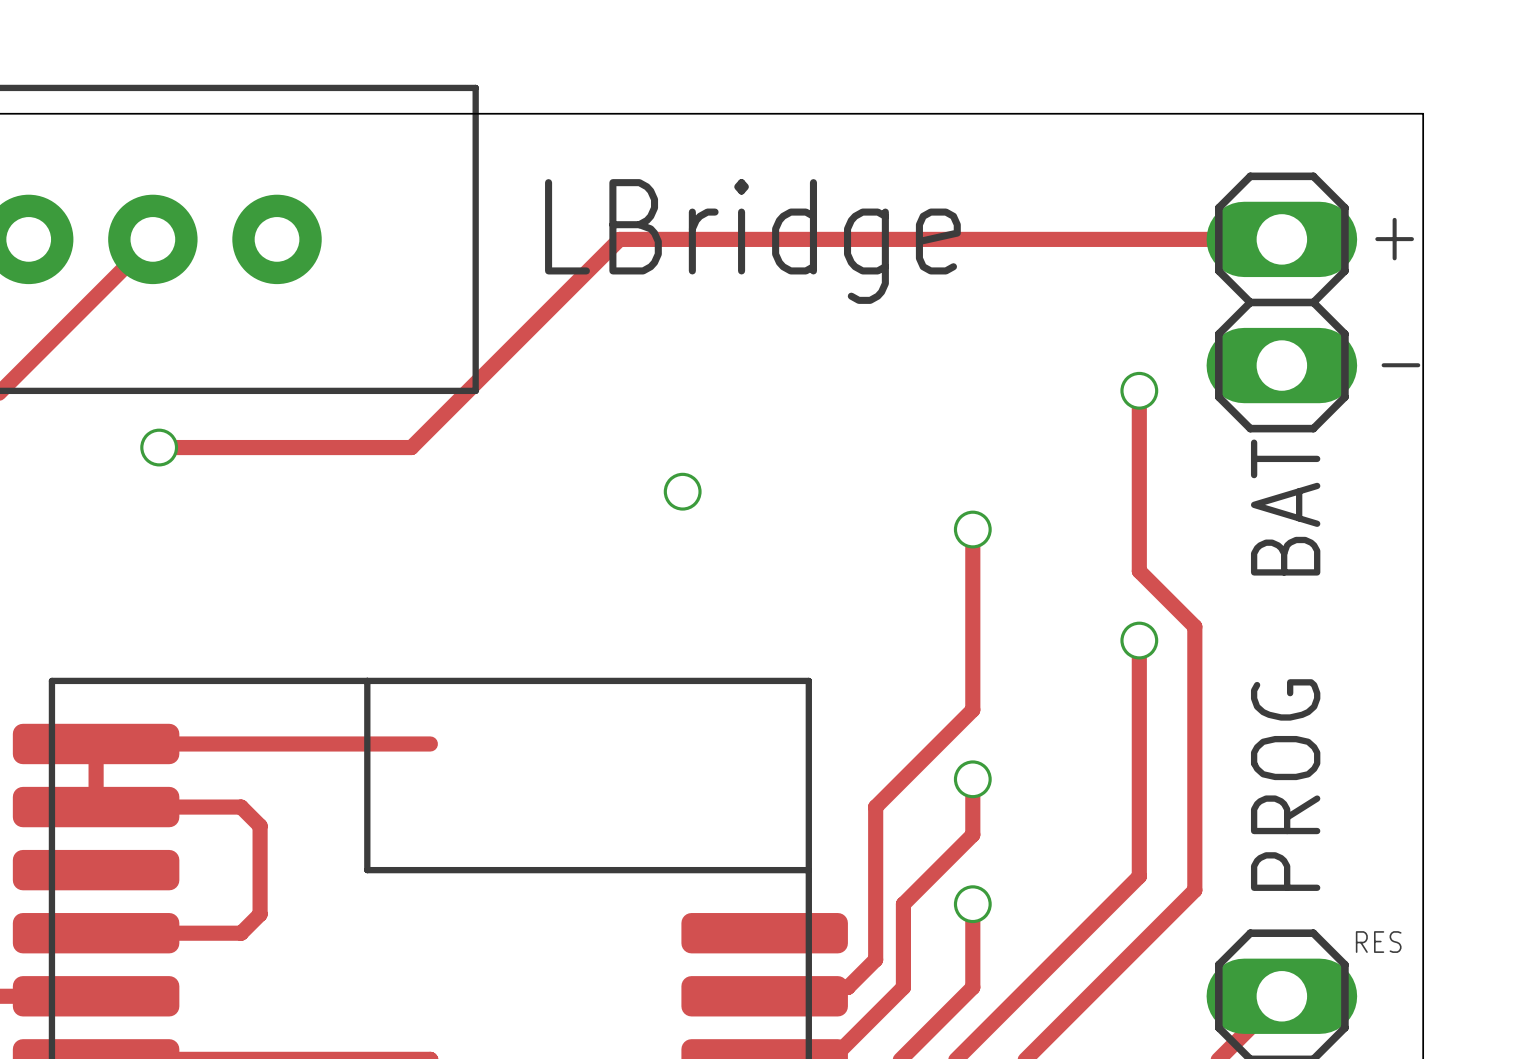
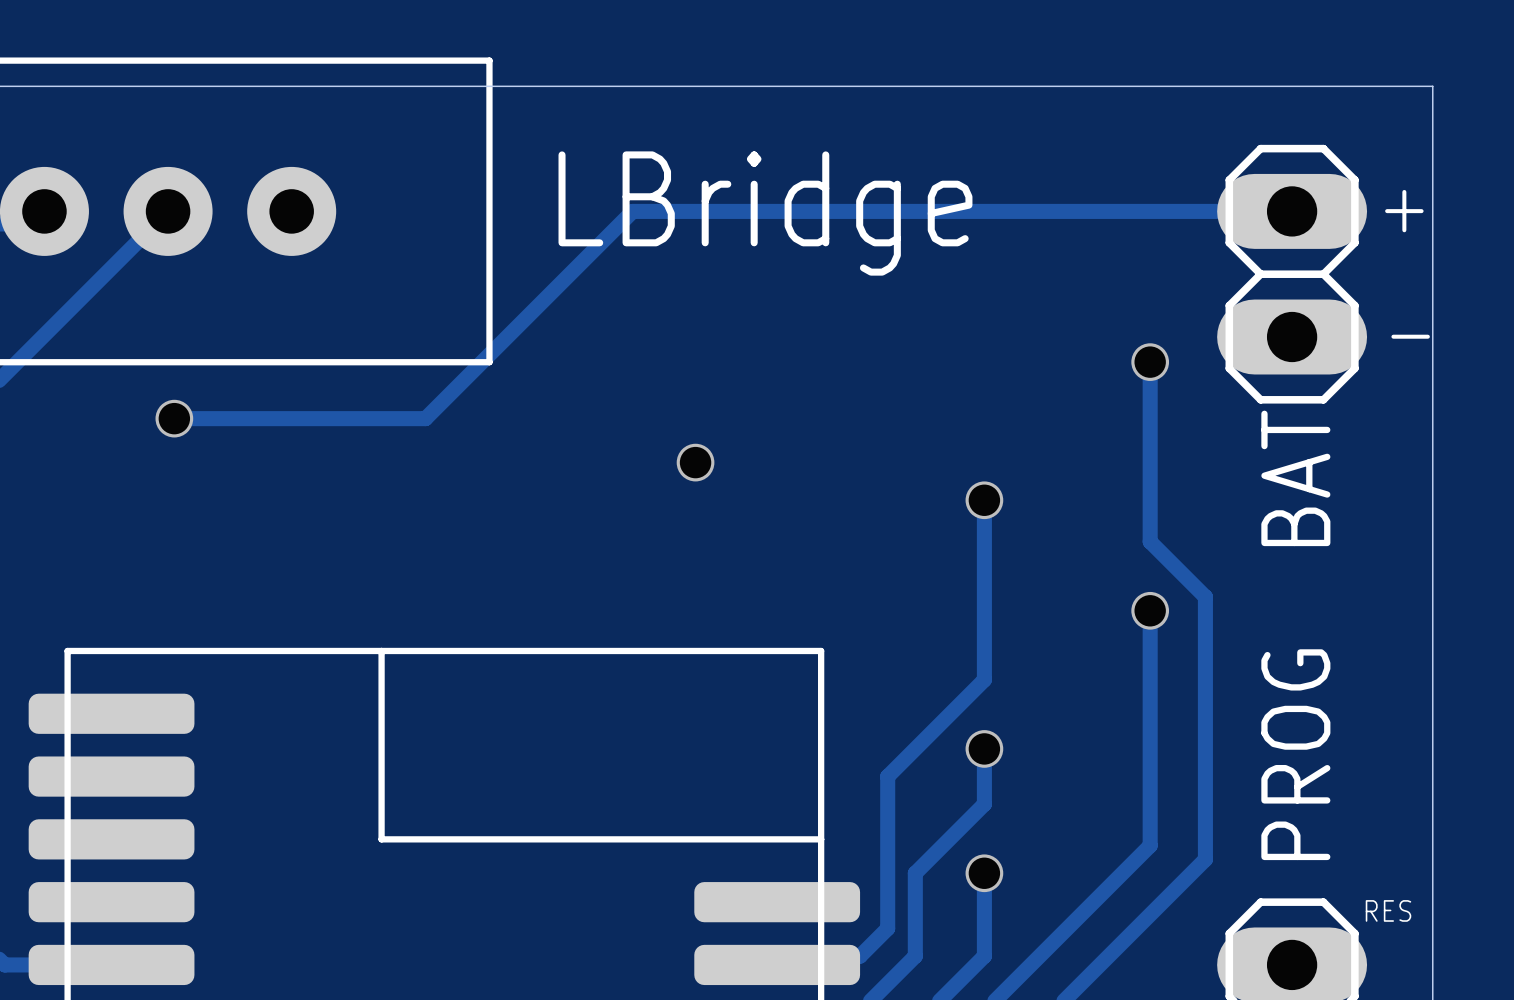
track: (430, 743) (96, 743) (96, 807) (241, 807) (260, 825) (260, 914) (241, 933) (96, 933) -> none

